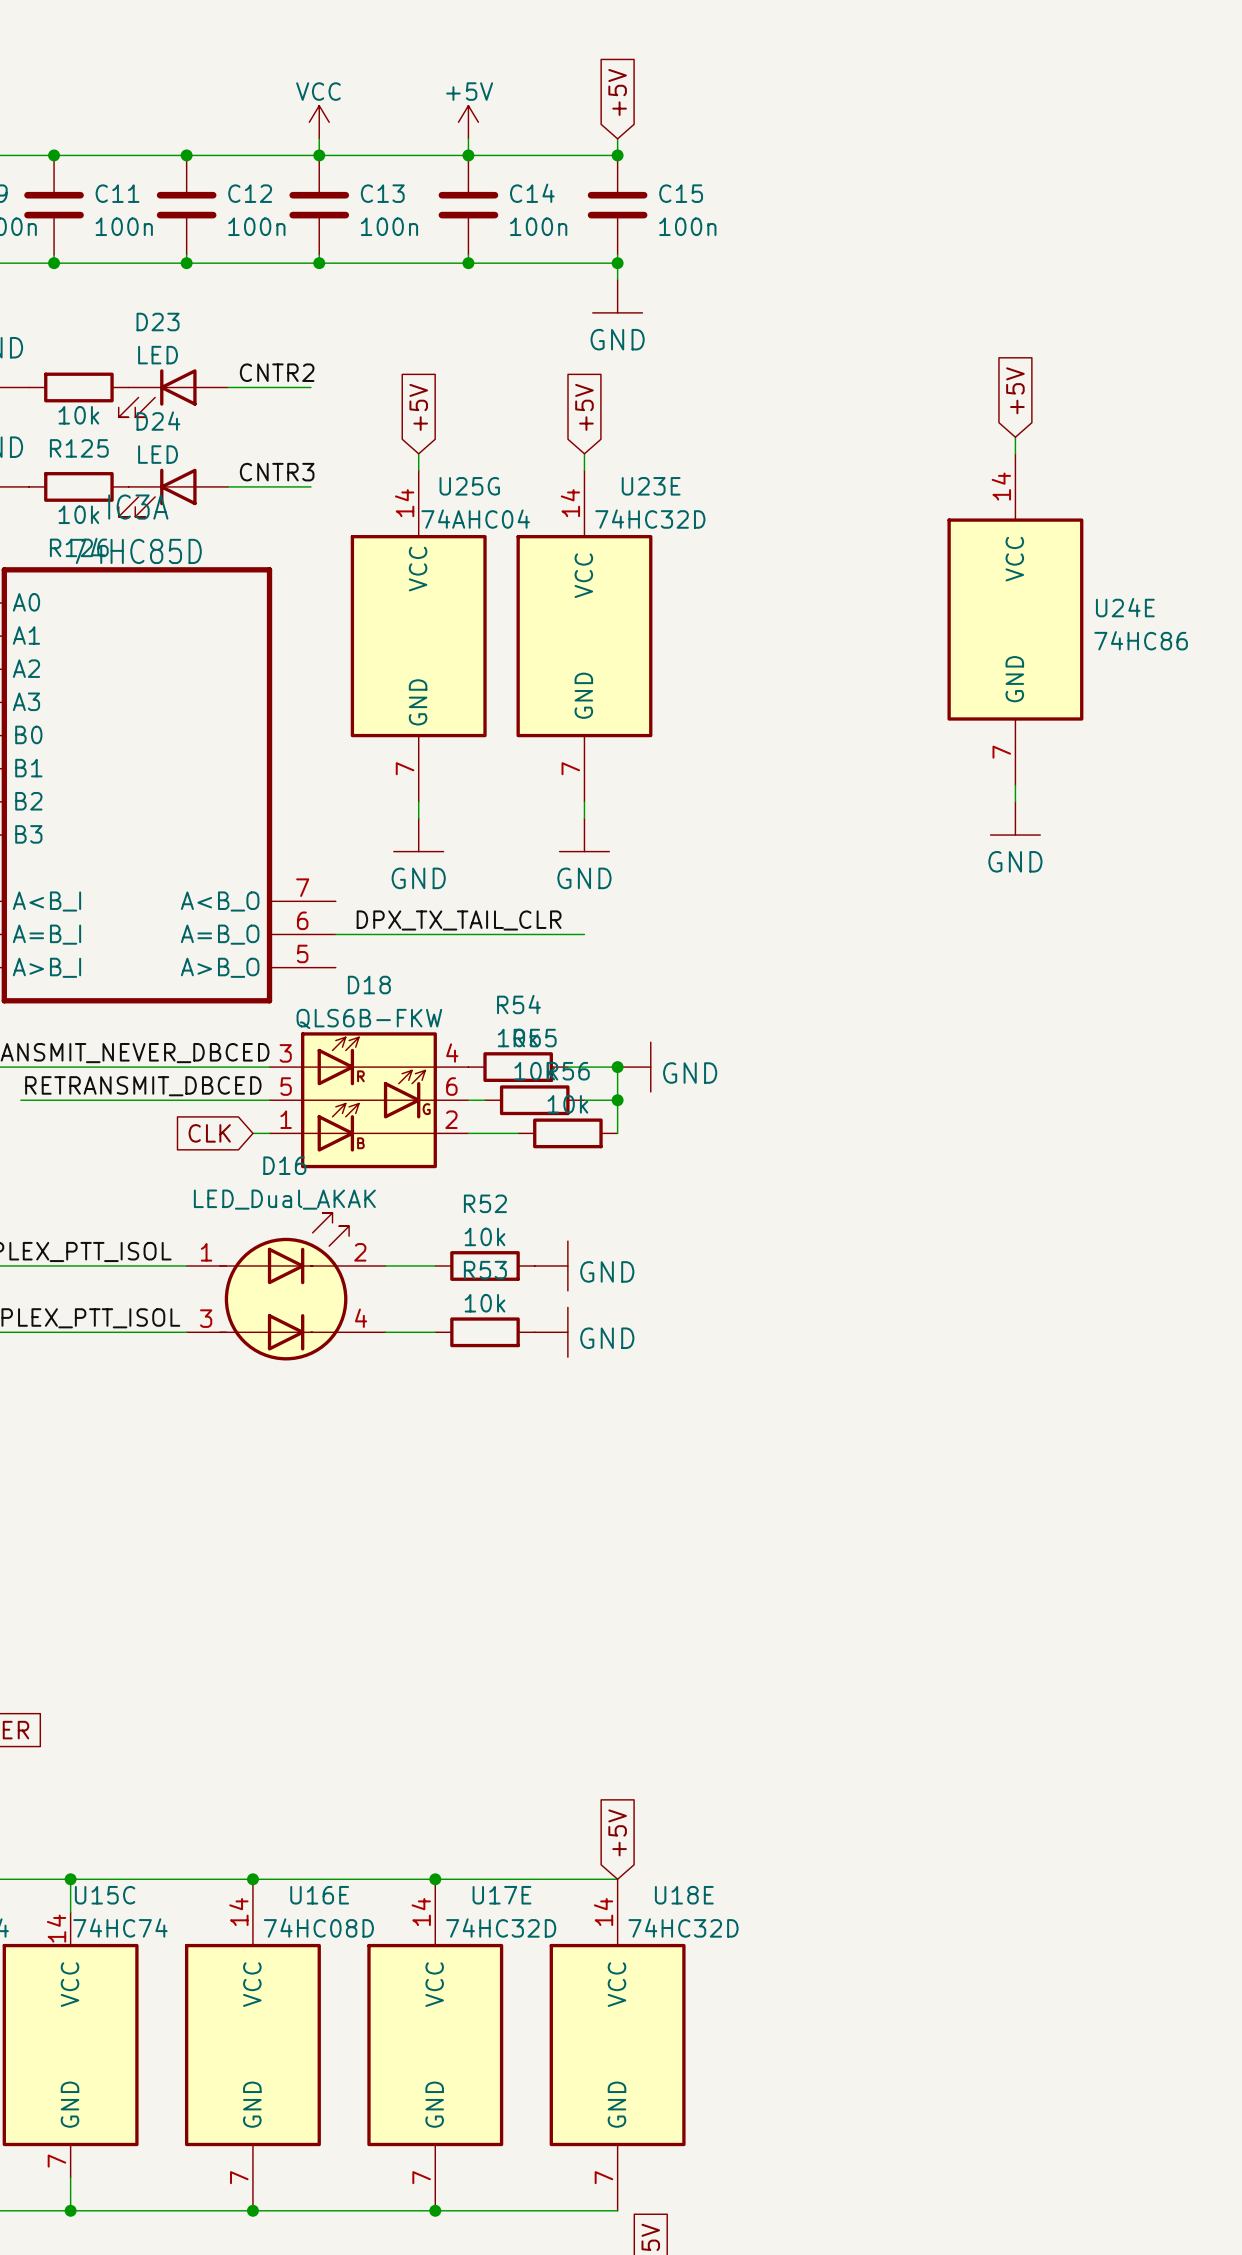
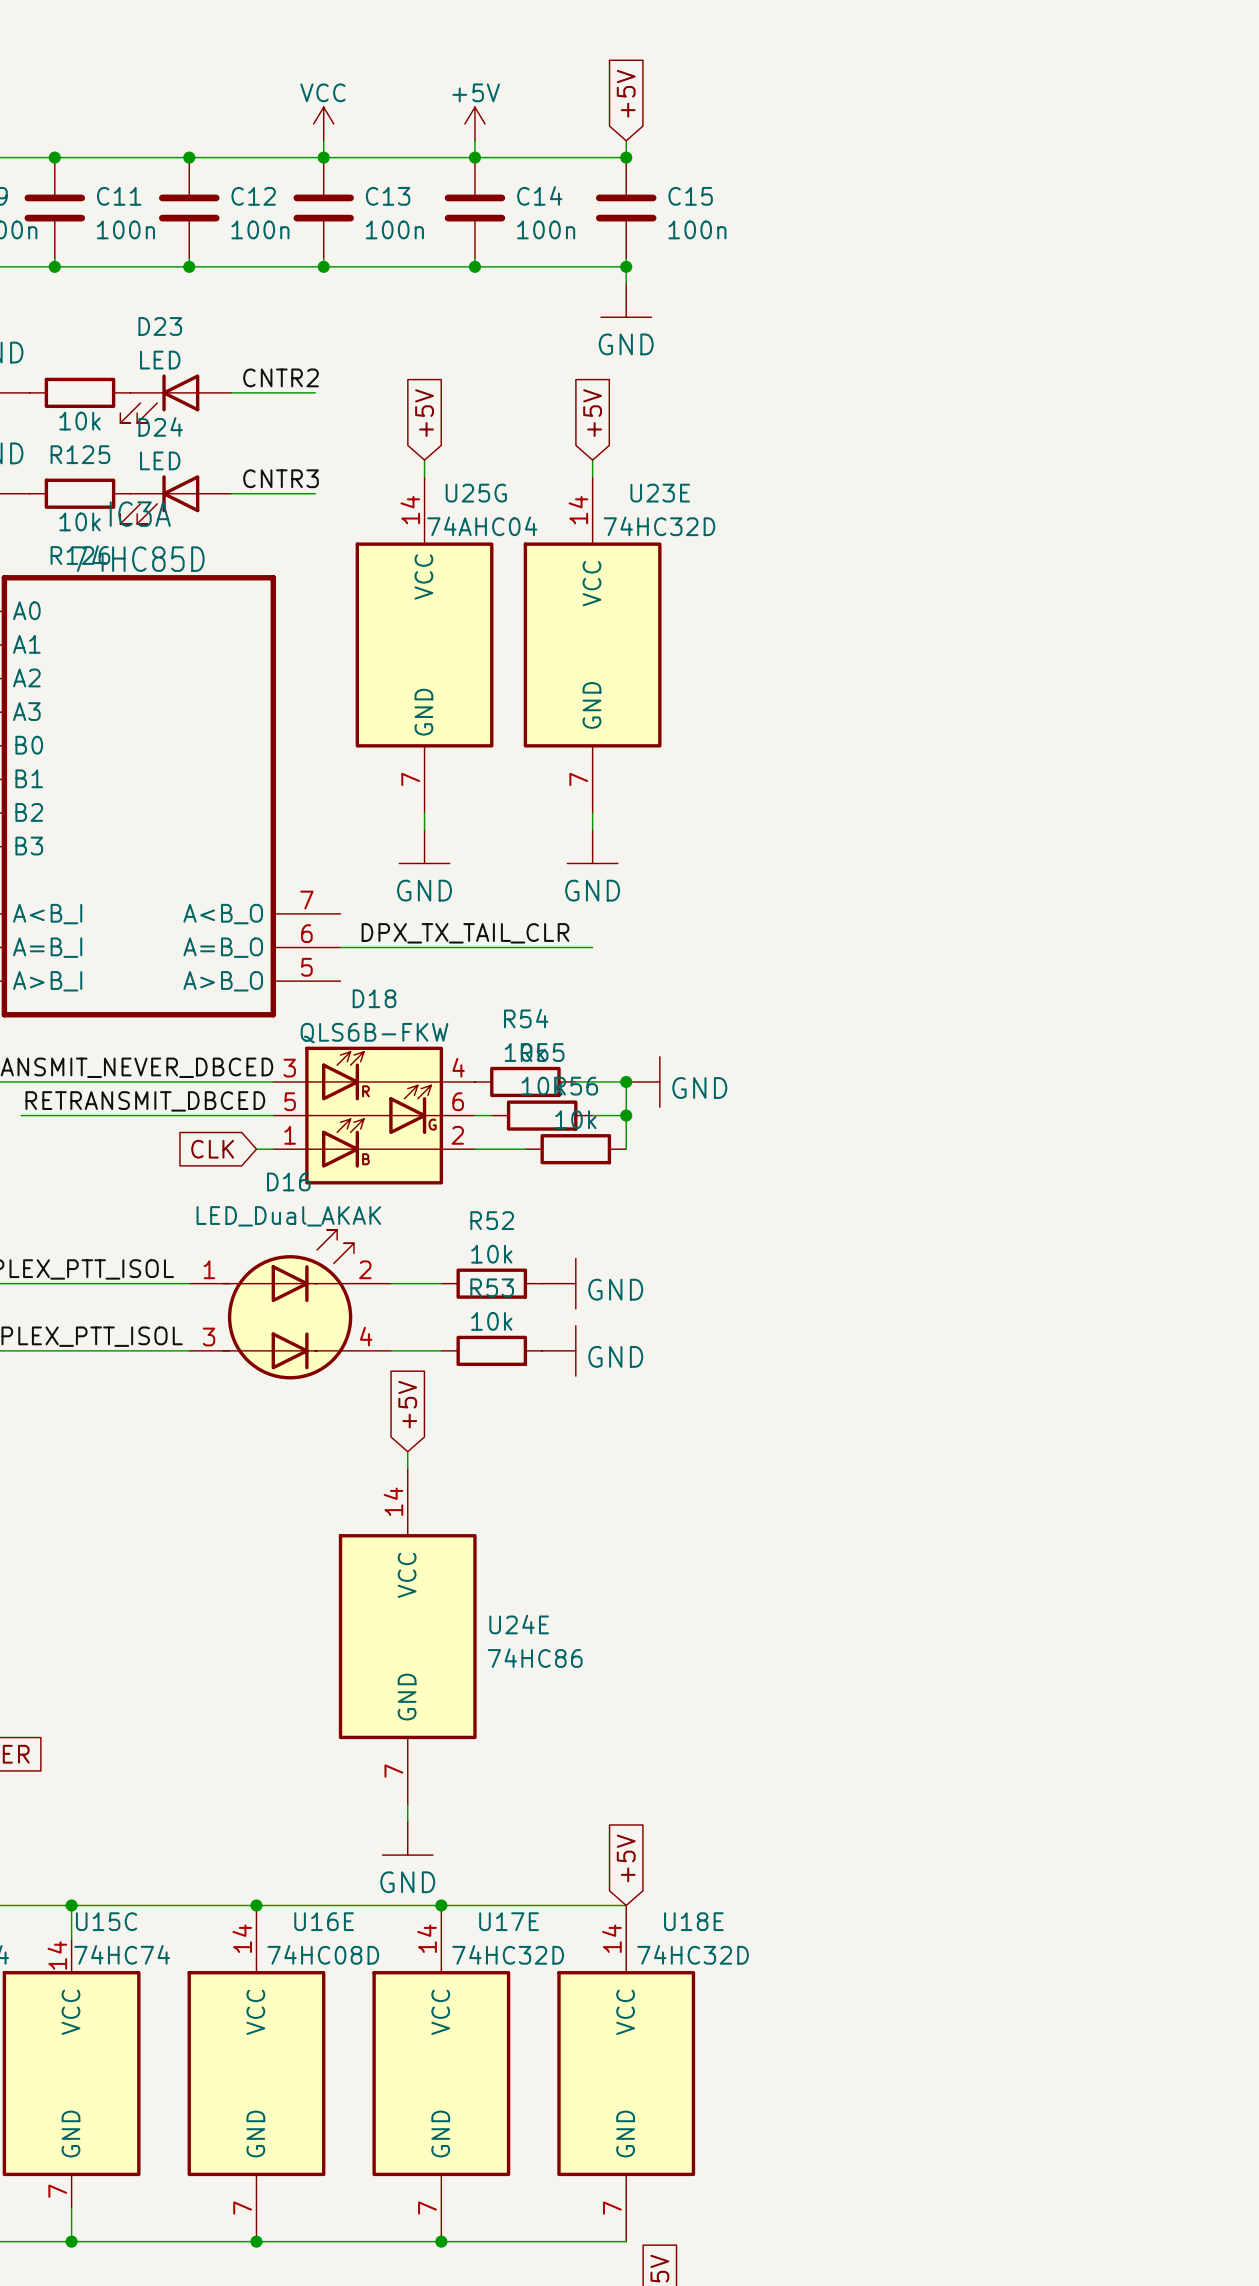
global label: +5V (1015, 390) -> none
wire: (1015, 437) (1015, 453) -> none
U24E position: (1015, 619) -> (407, 1636)
wire: (1015, 785) (1015, 801) -> none
power symbol: GND (1015, 818) -> none
global label: none -> +5V (407, 1404)
wire: none -> (407, 1451) (407, 1468)
wire: none -> (407, 1804) (407, 1821)
power symbol: none -> GND (407, 1838)

